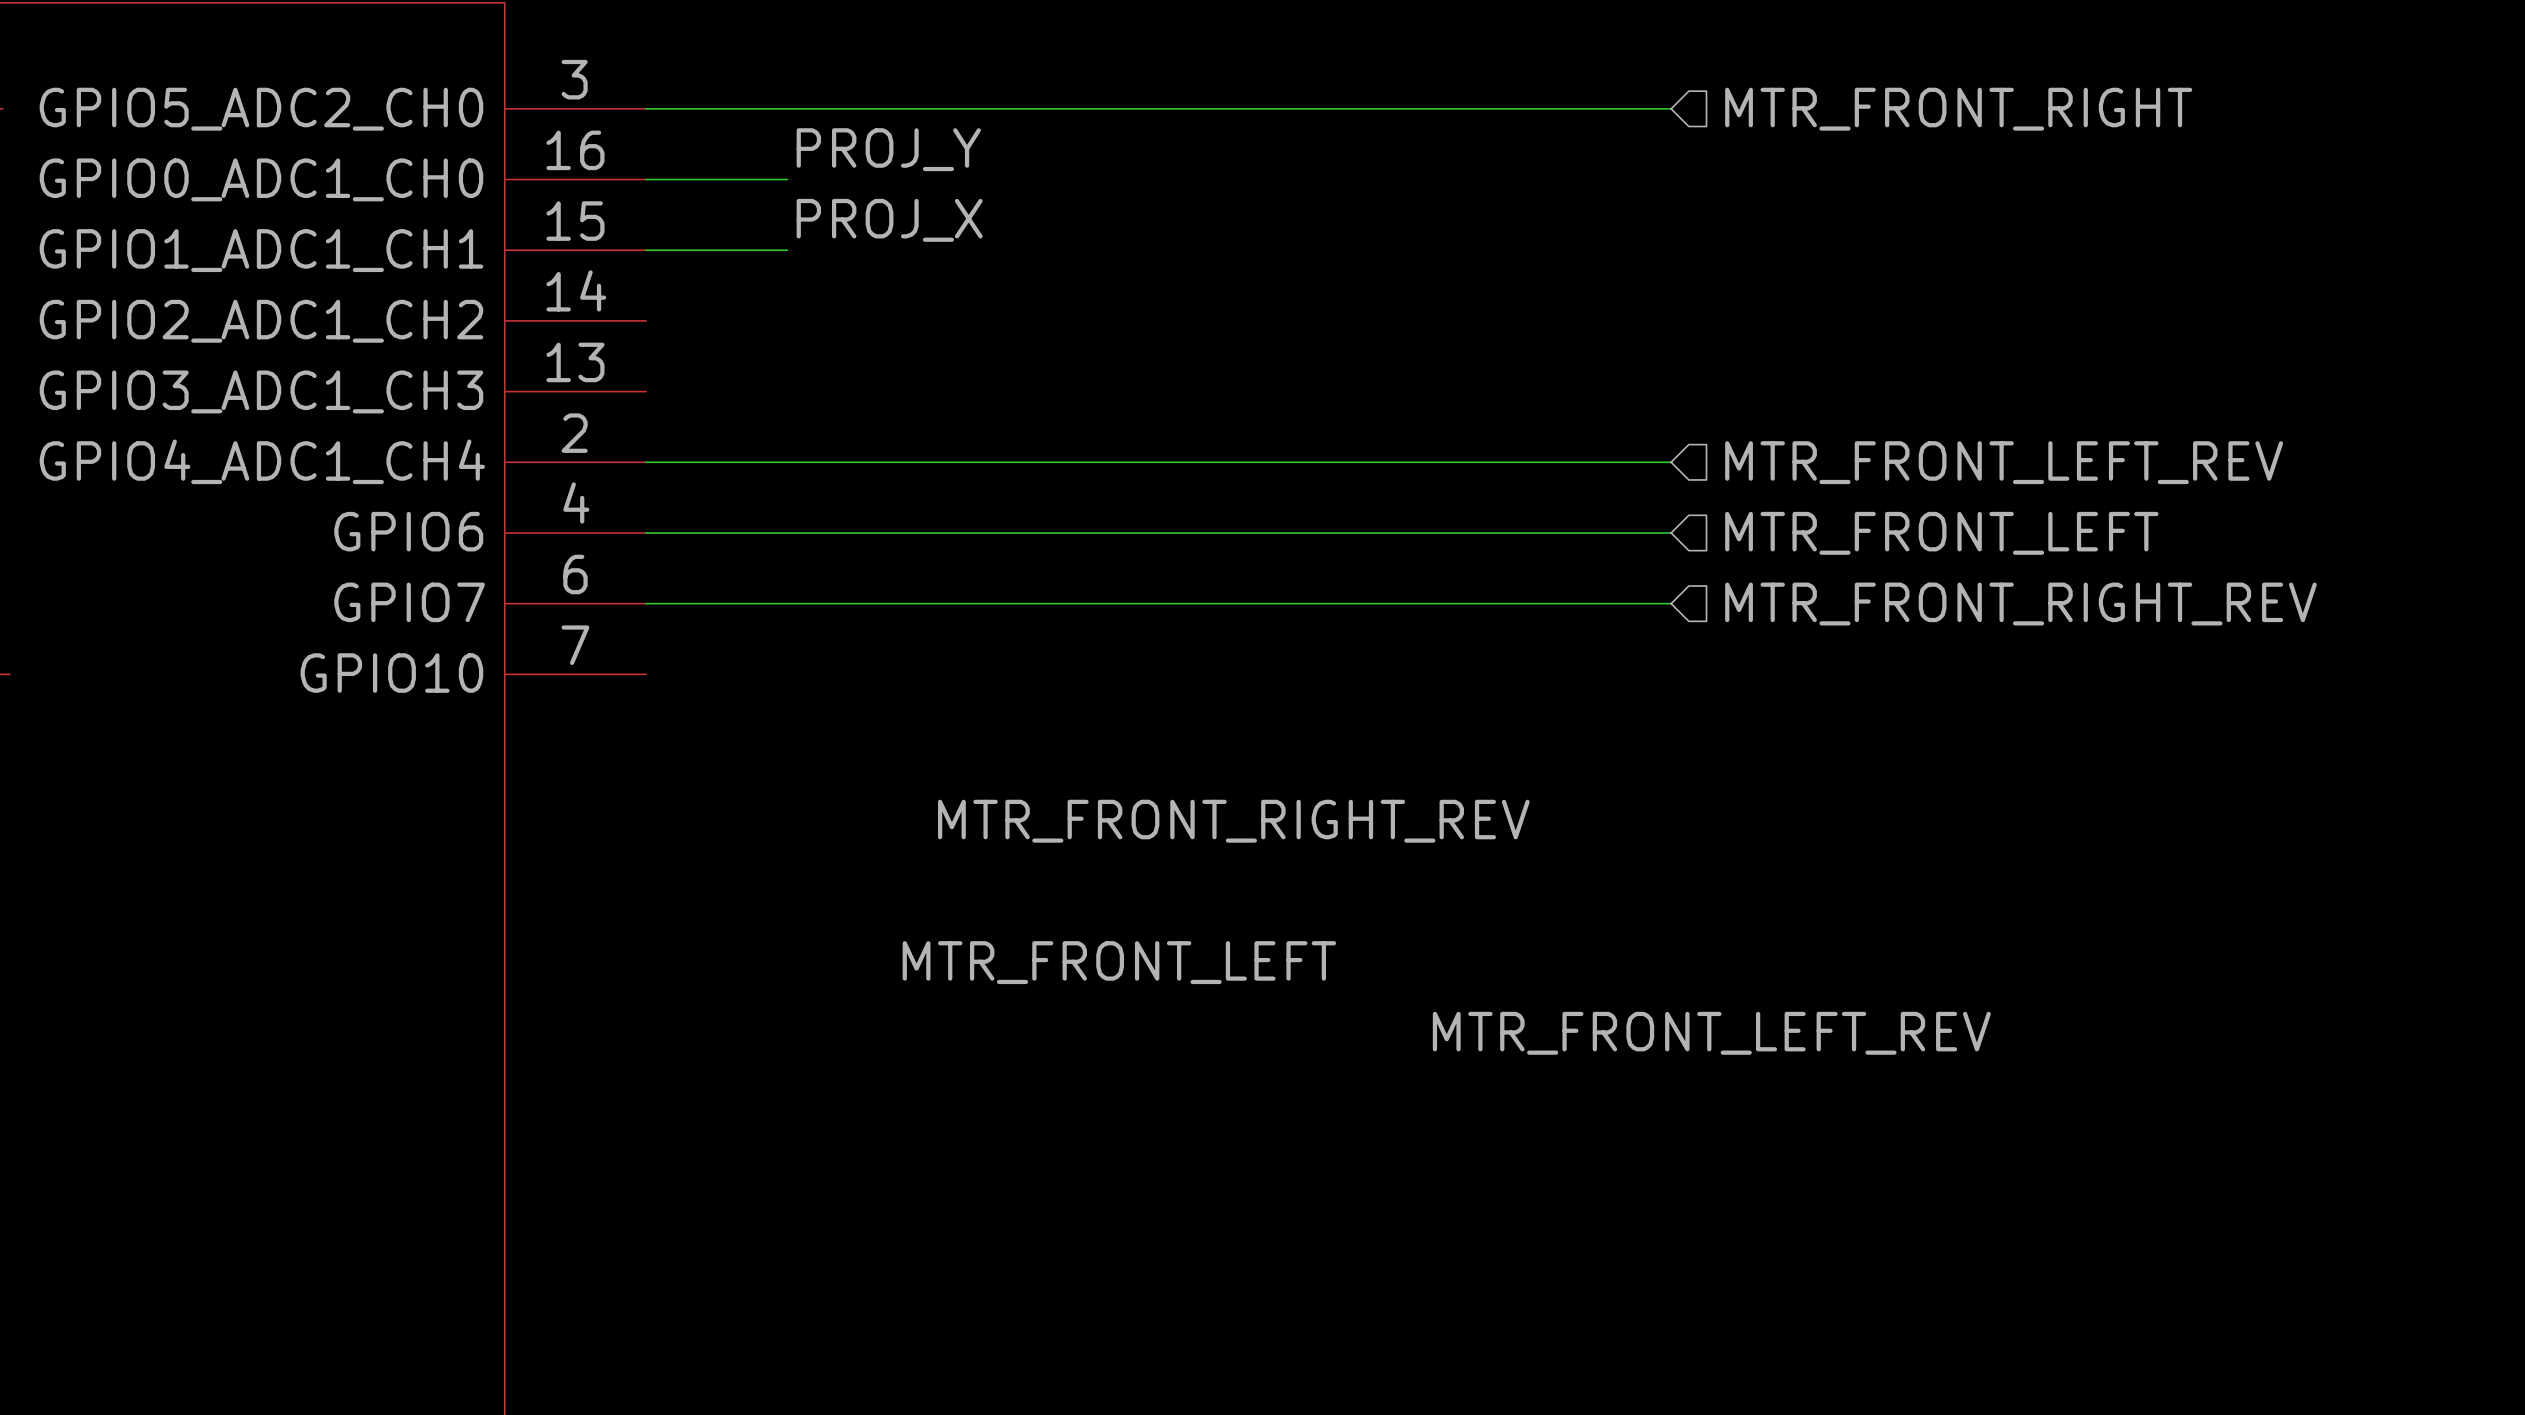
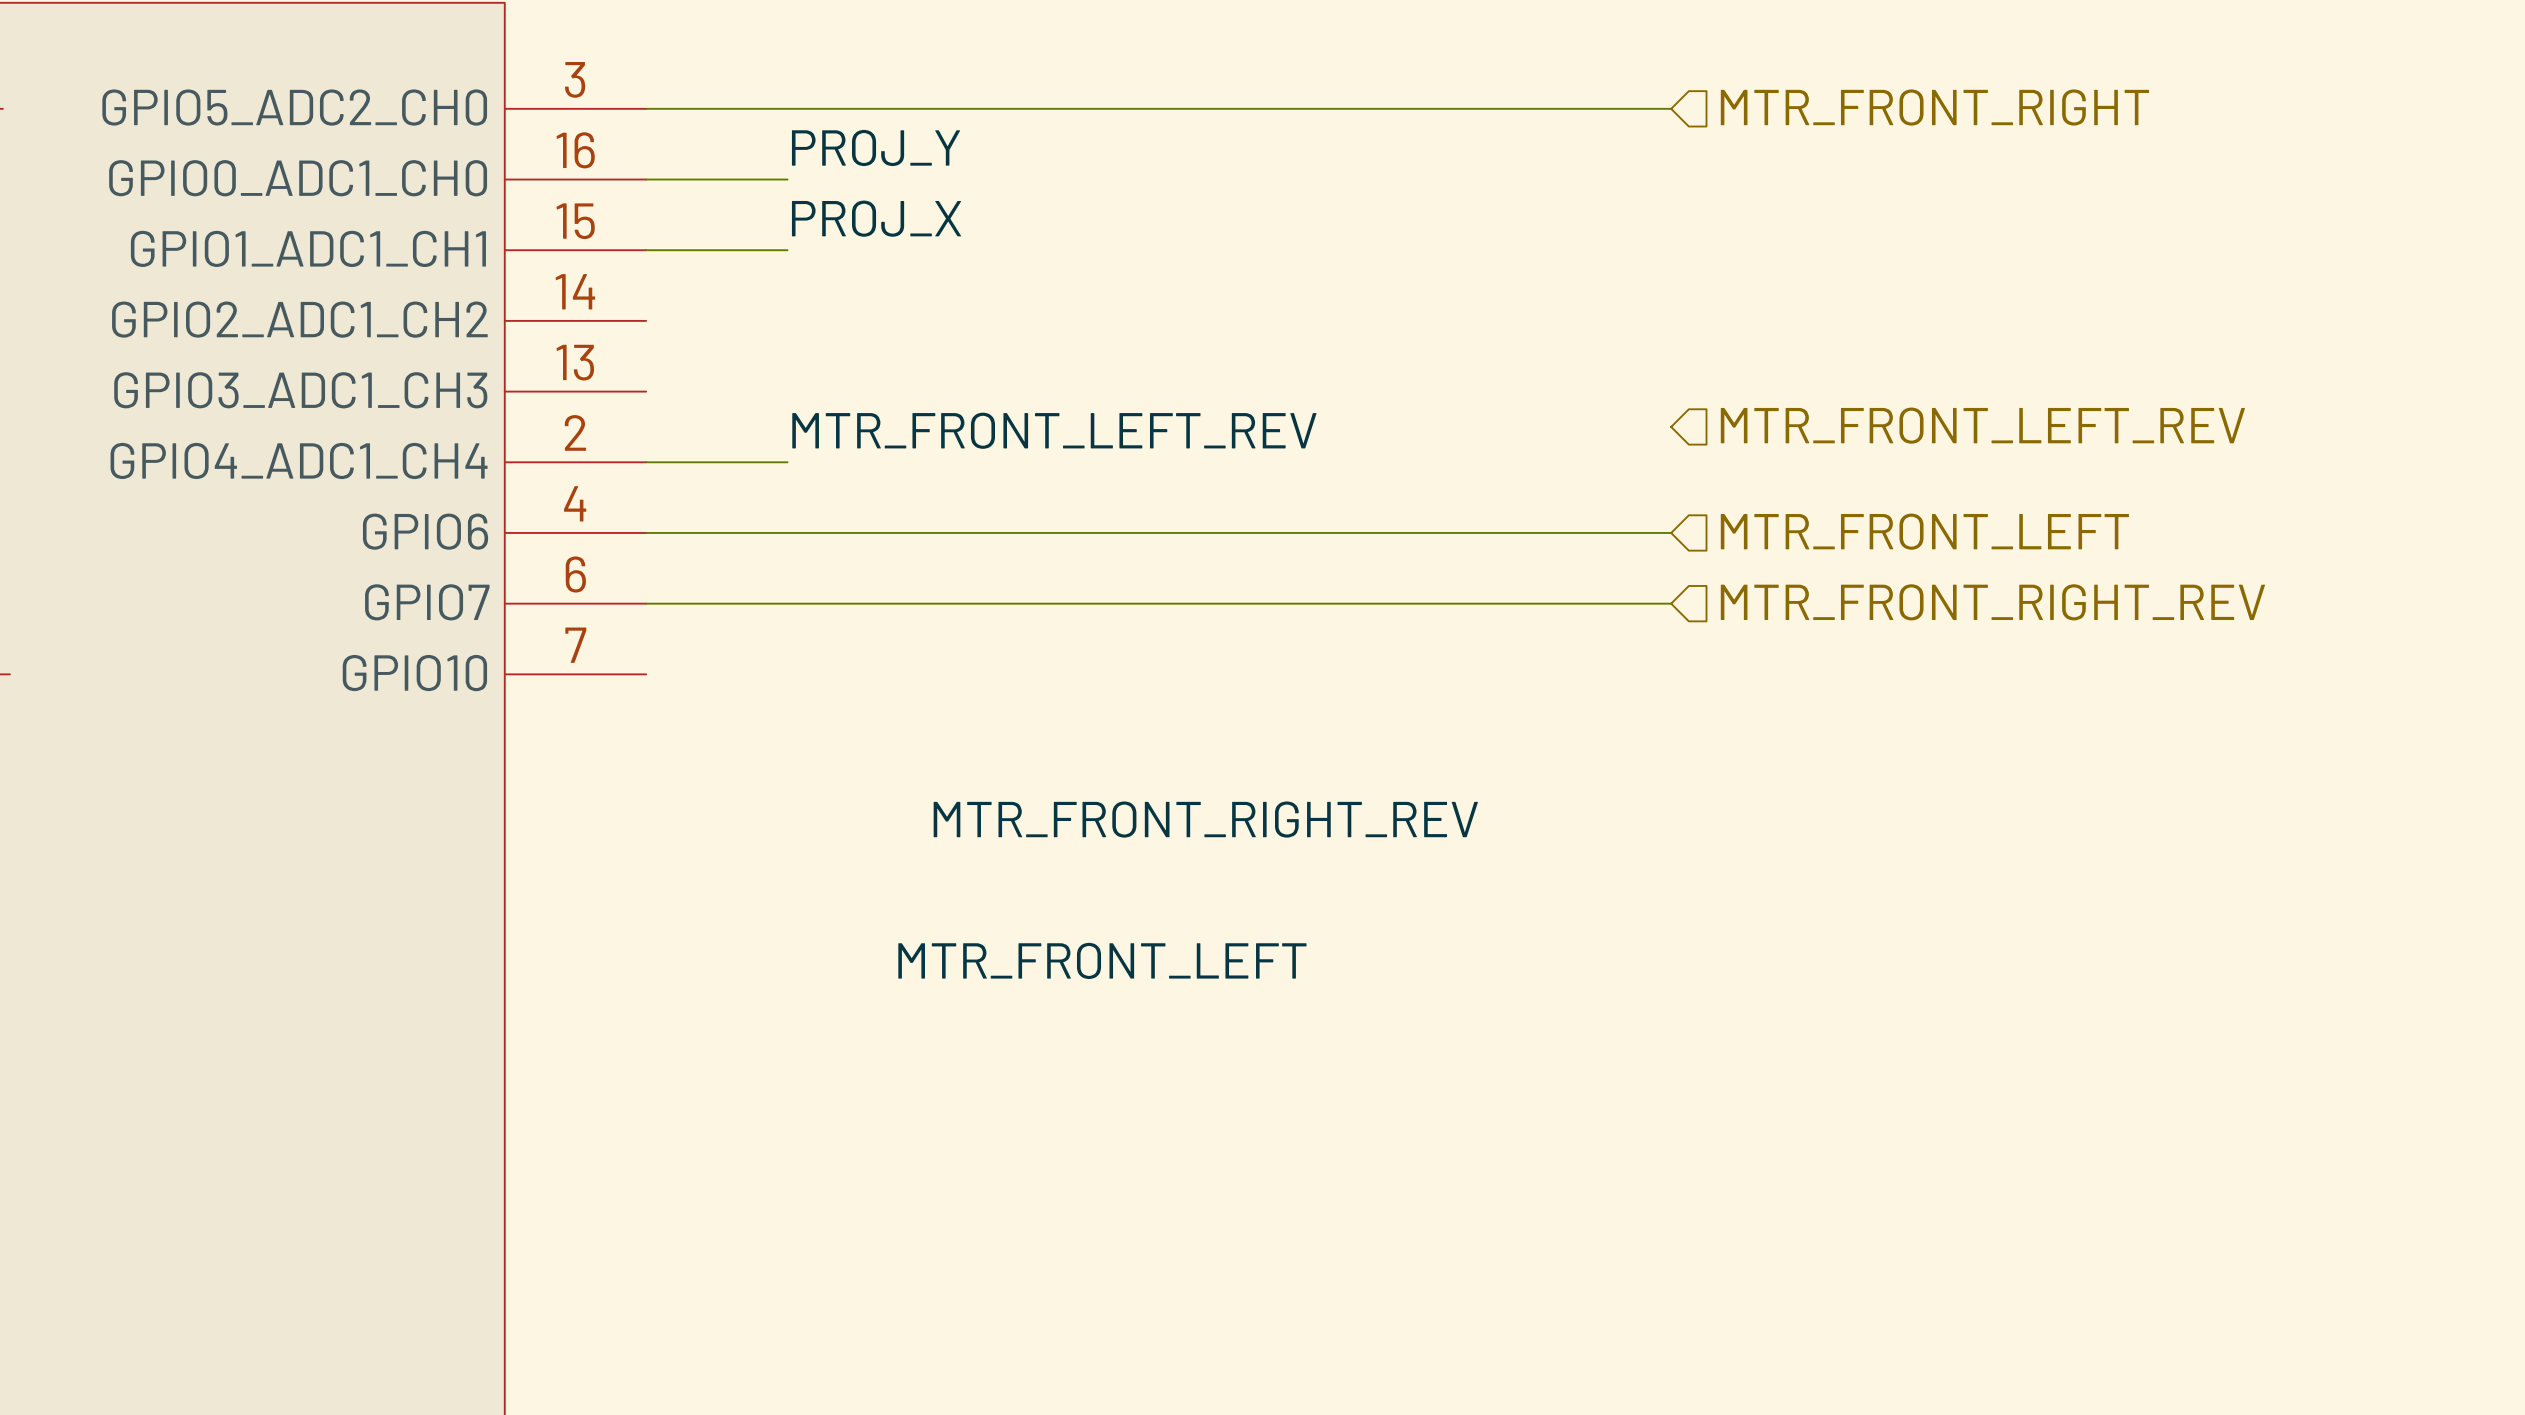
label: none -> MTR_FRONT_LEFT_REV (1054, 430)
wire: (787, 462) (1671, 462) -> none
hierarchical label position: MTR_FRONT_LEFT_REV (2004, 462) -> MTR_FRONT_LEFT_REV (1982, 425)
label: MTR_FRONT_LEFT_REV (1711, 1033) -> none

